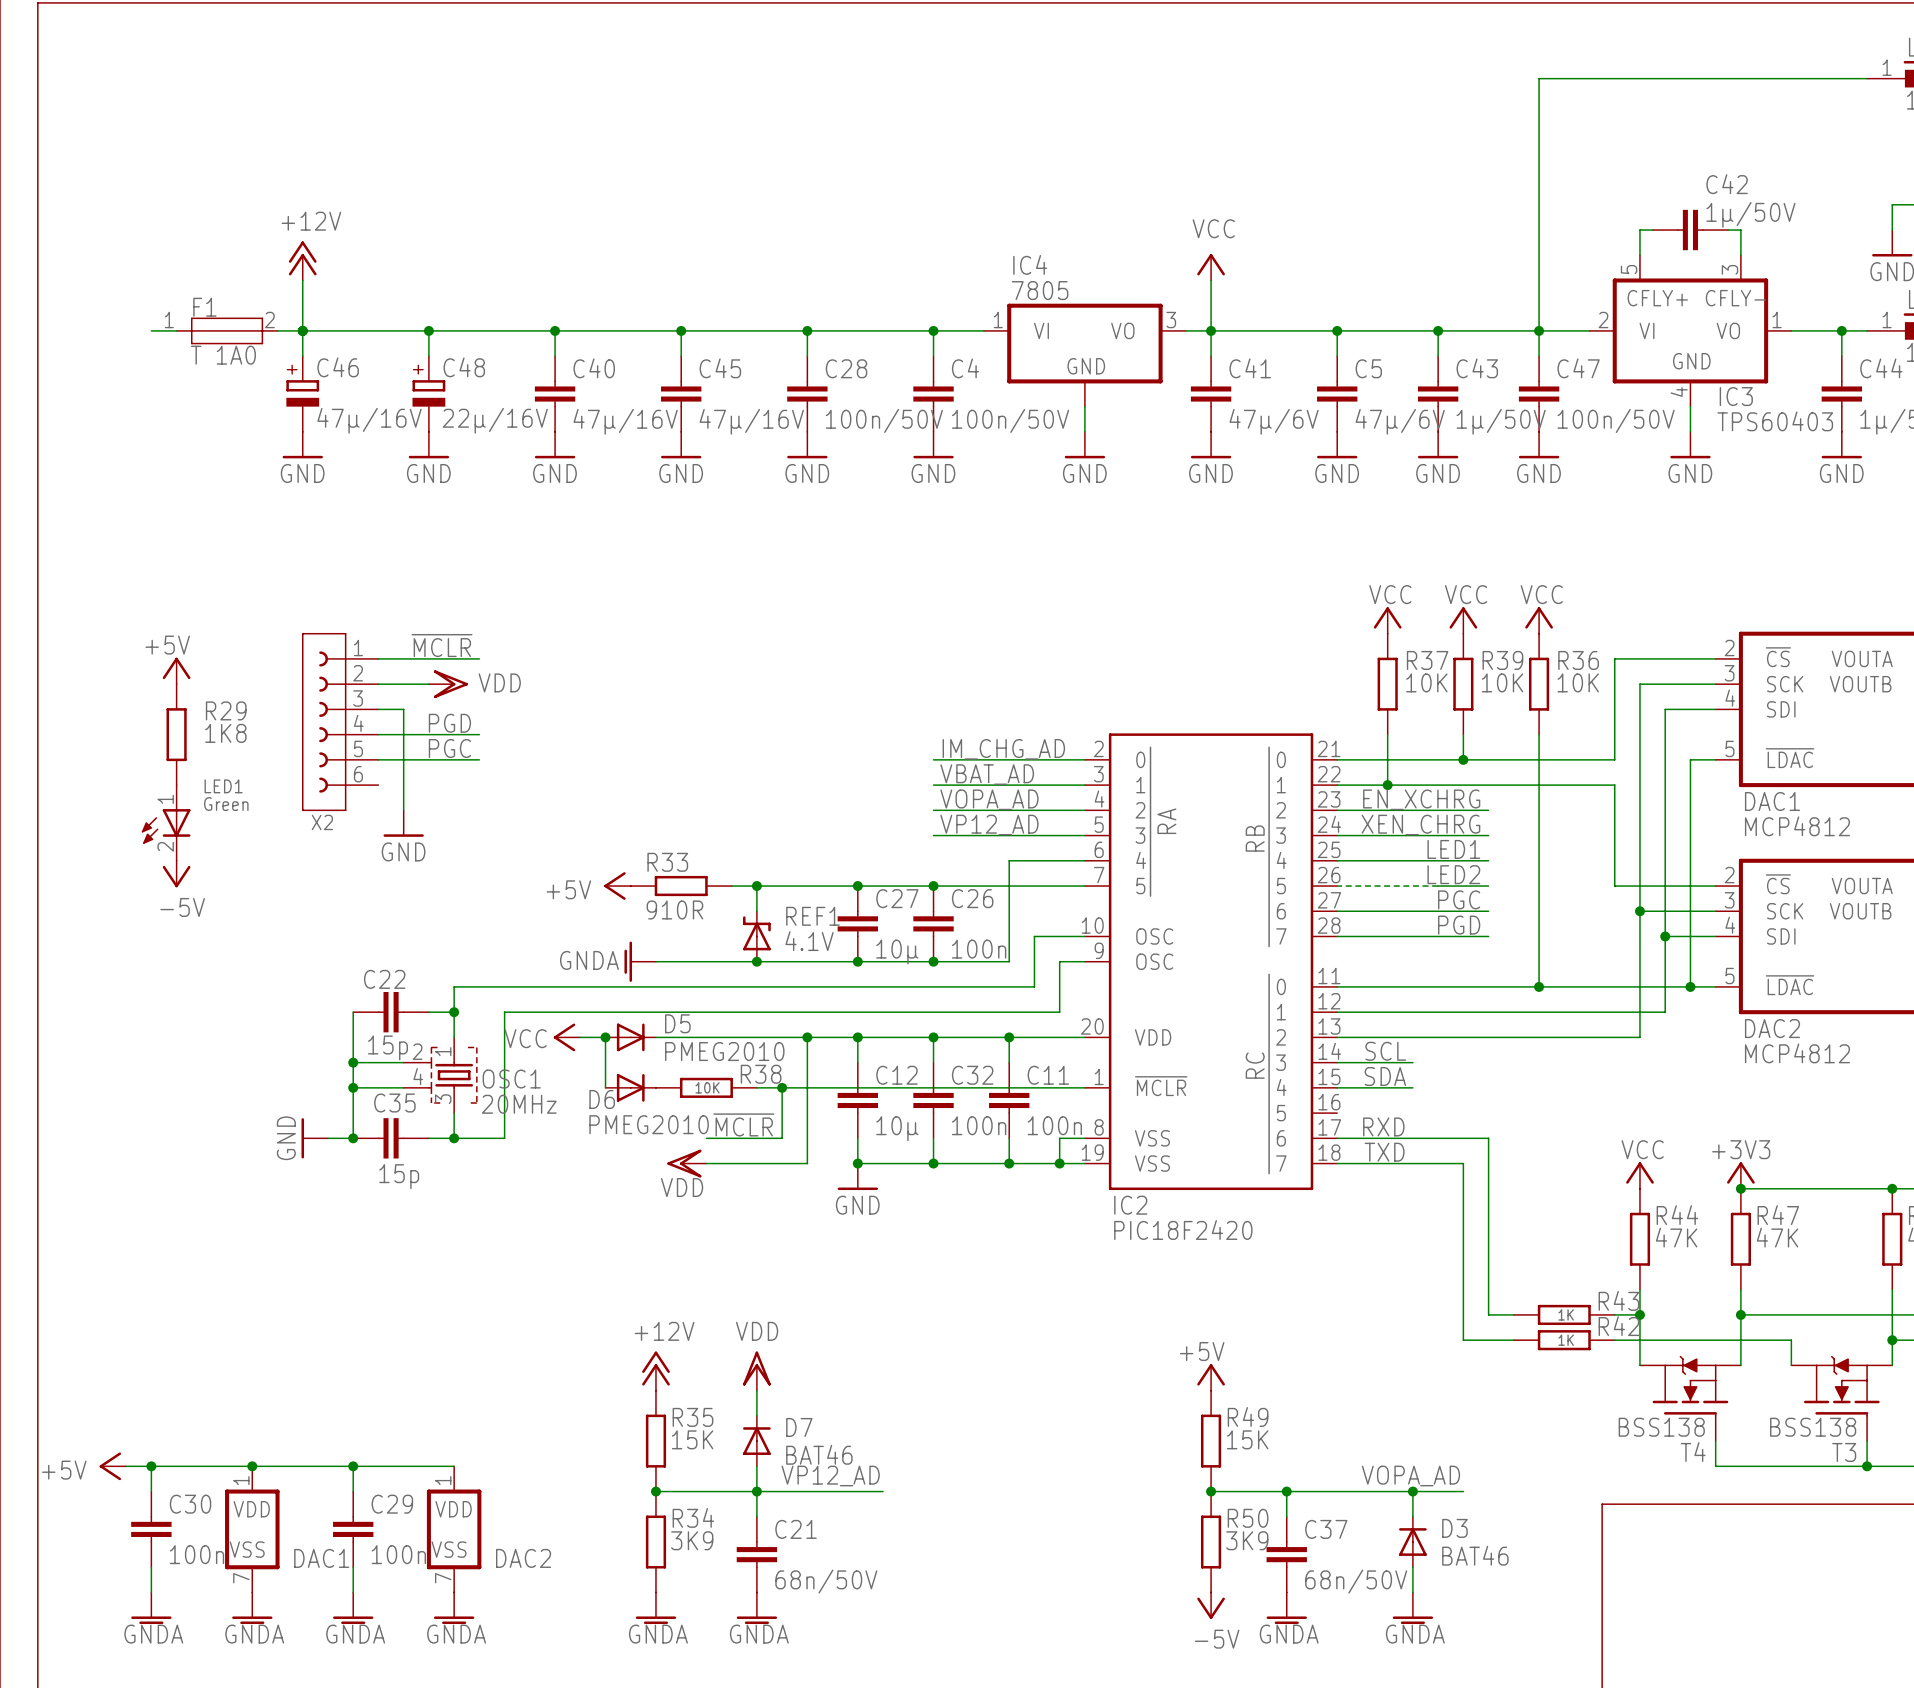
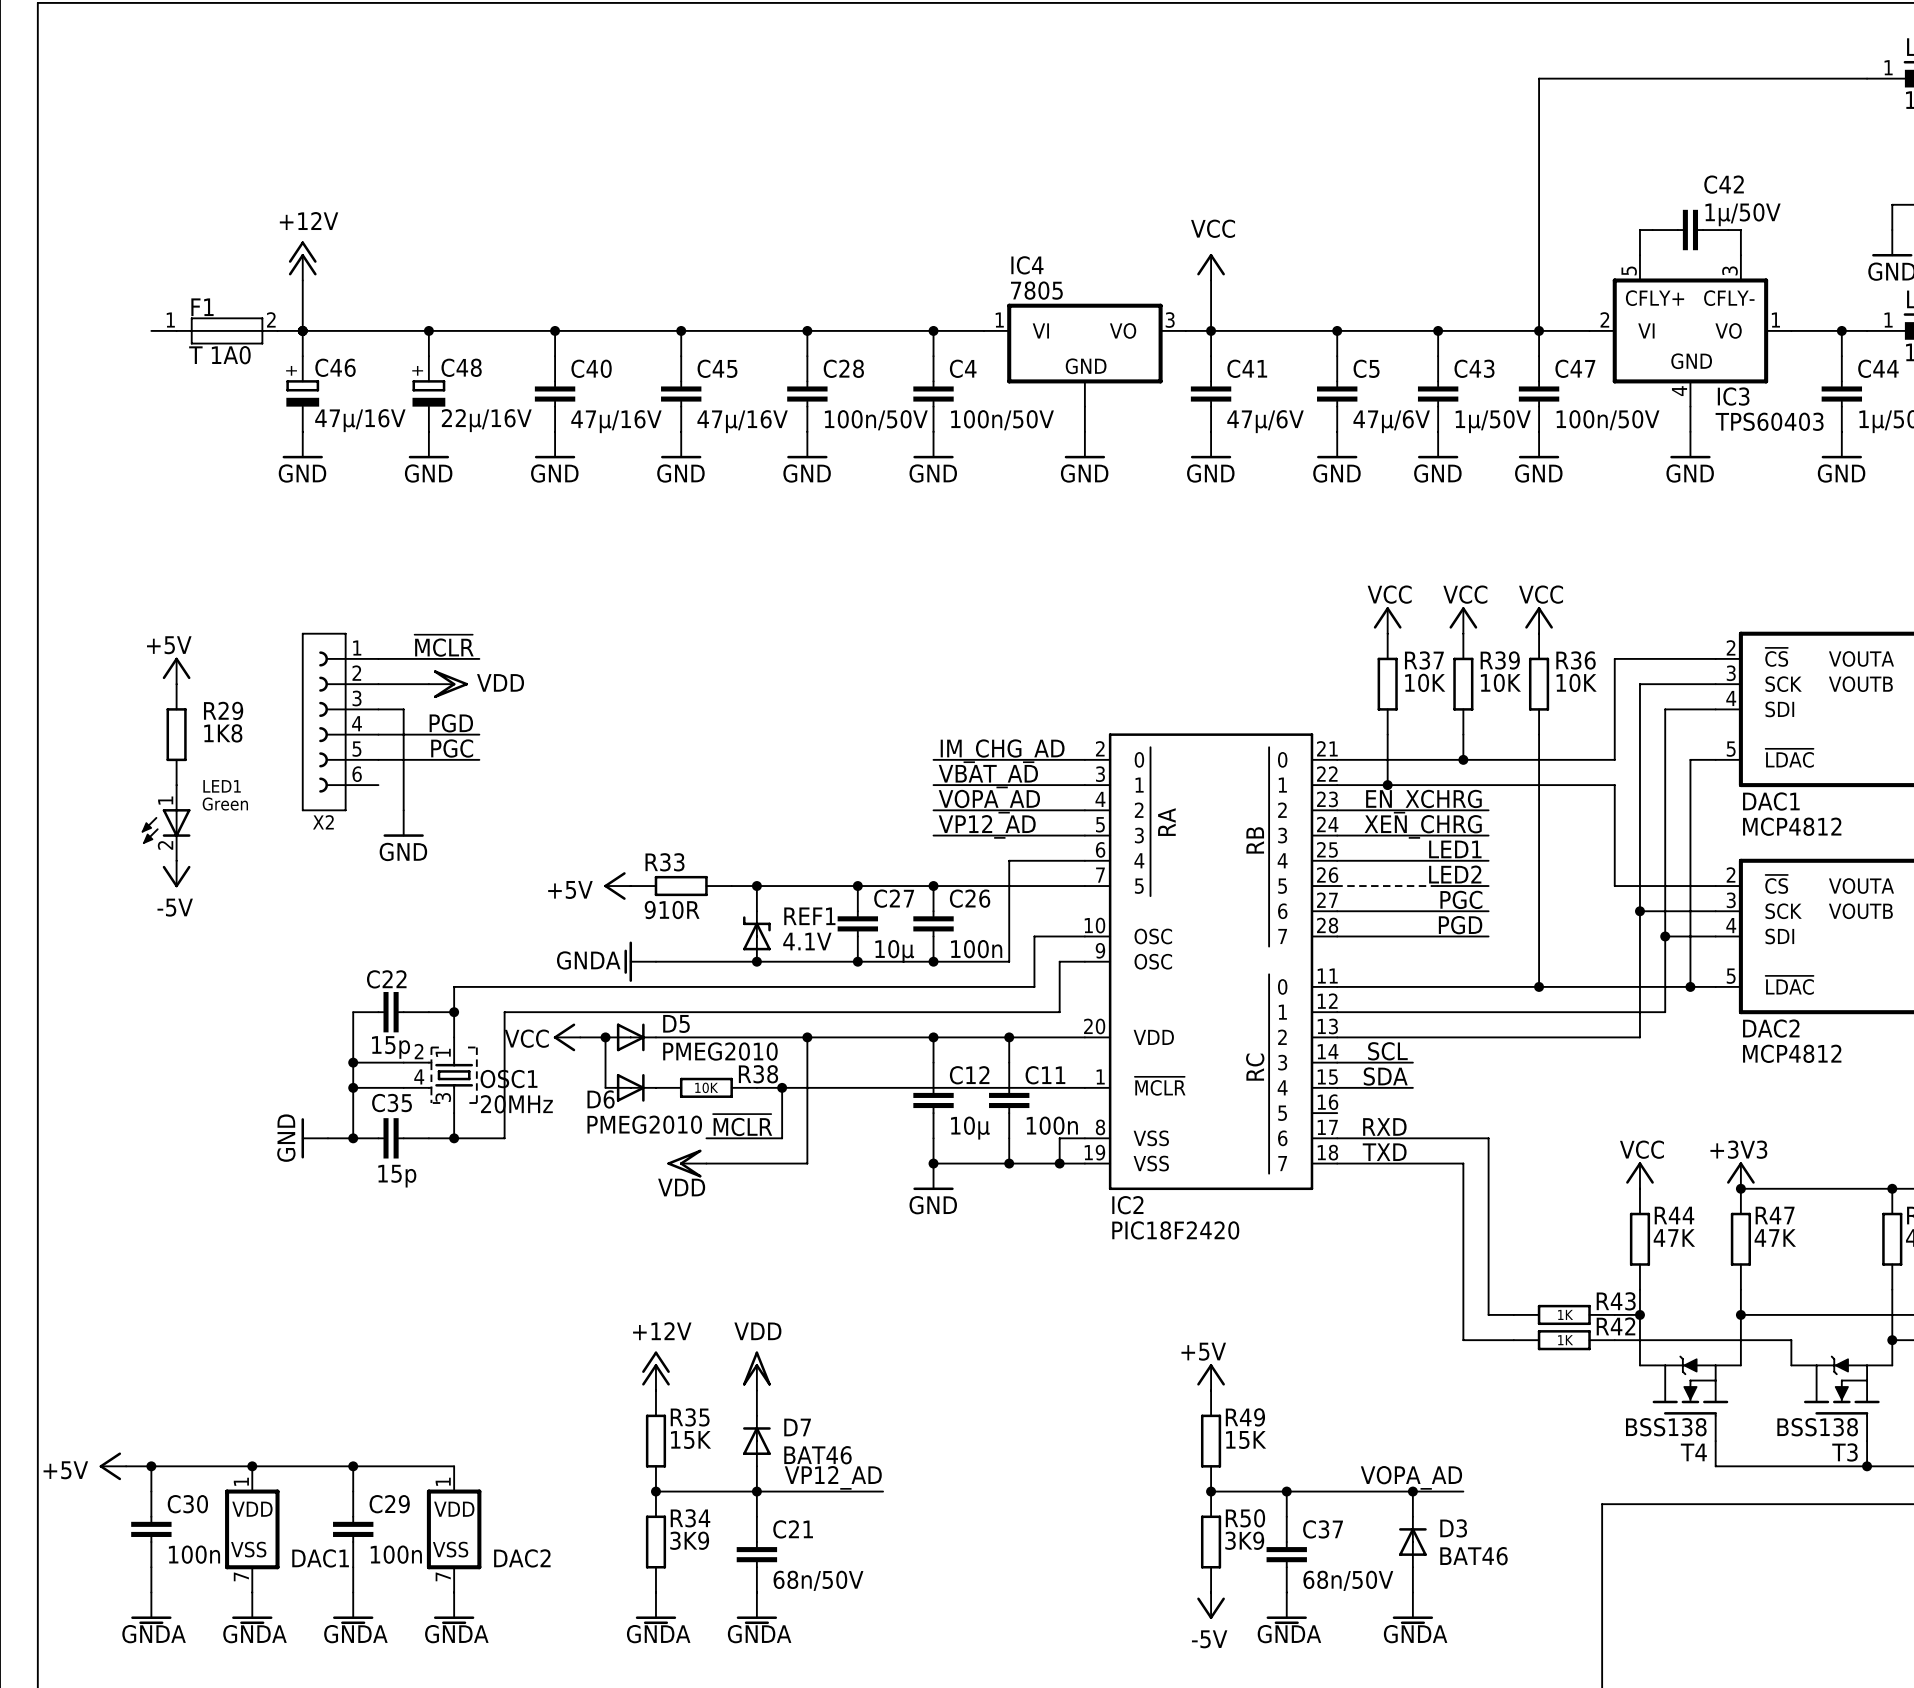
wire: (857, 1037) (857, 1062) -> none
junction: (857, 1037) -> none
C32 name: C32 (972, 1075) -> C12 (969, 1075)
C12: 10µ (857, 1100) -> none
C32 value: 100n (979, 1125) -> 10µ (970, 1128)
wire: (857, 1138) (857, 1163) (933, 1163) -> none
junction: (857, 1163) -> none
power symbol position: GND (857, 1176) -> GND (933, 1176)

